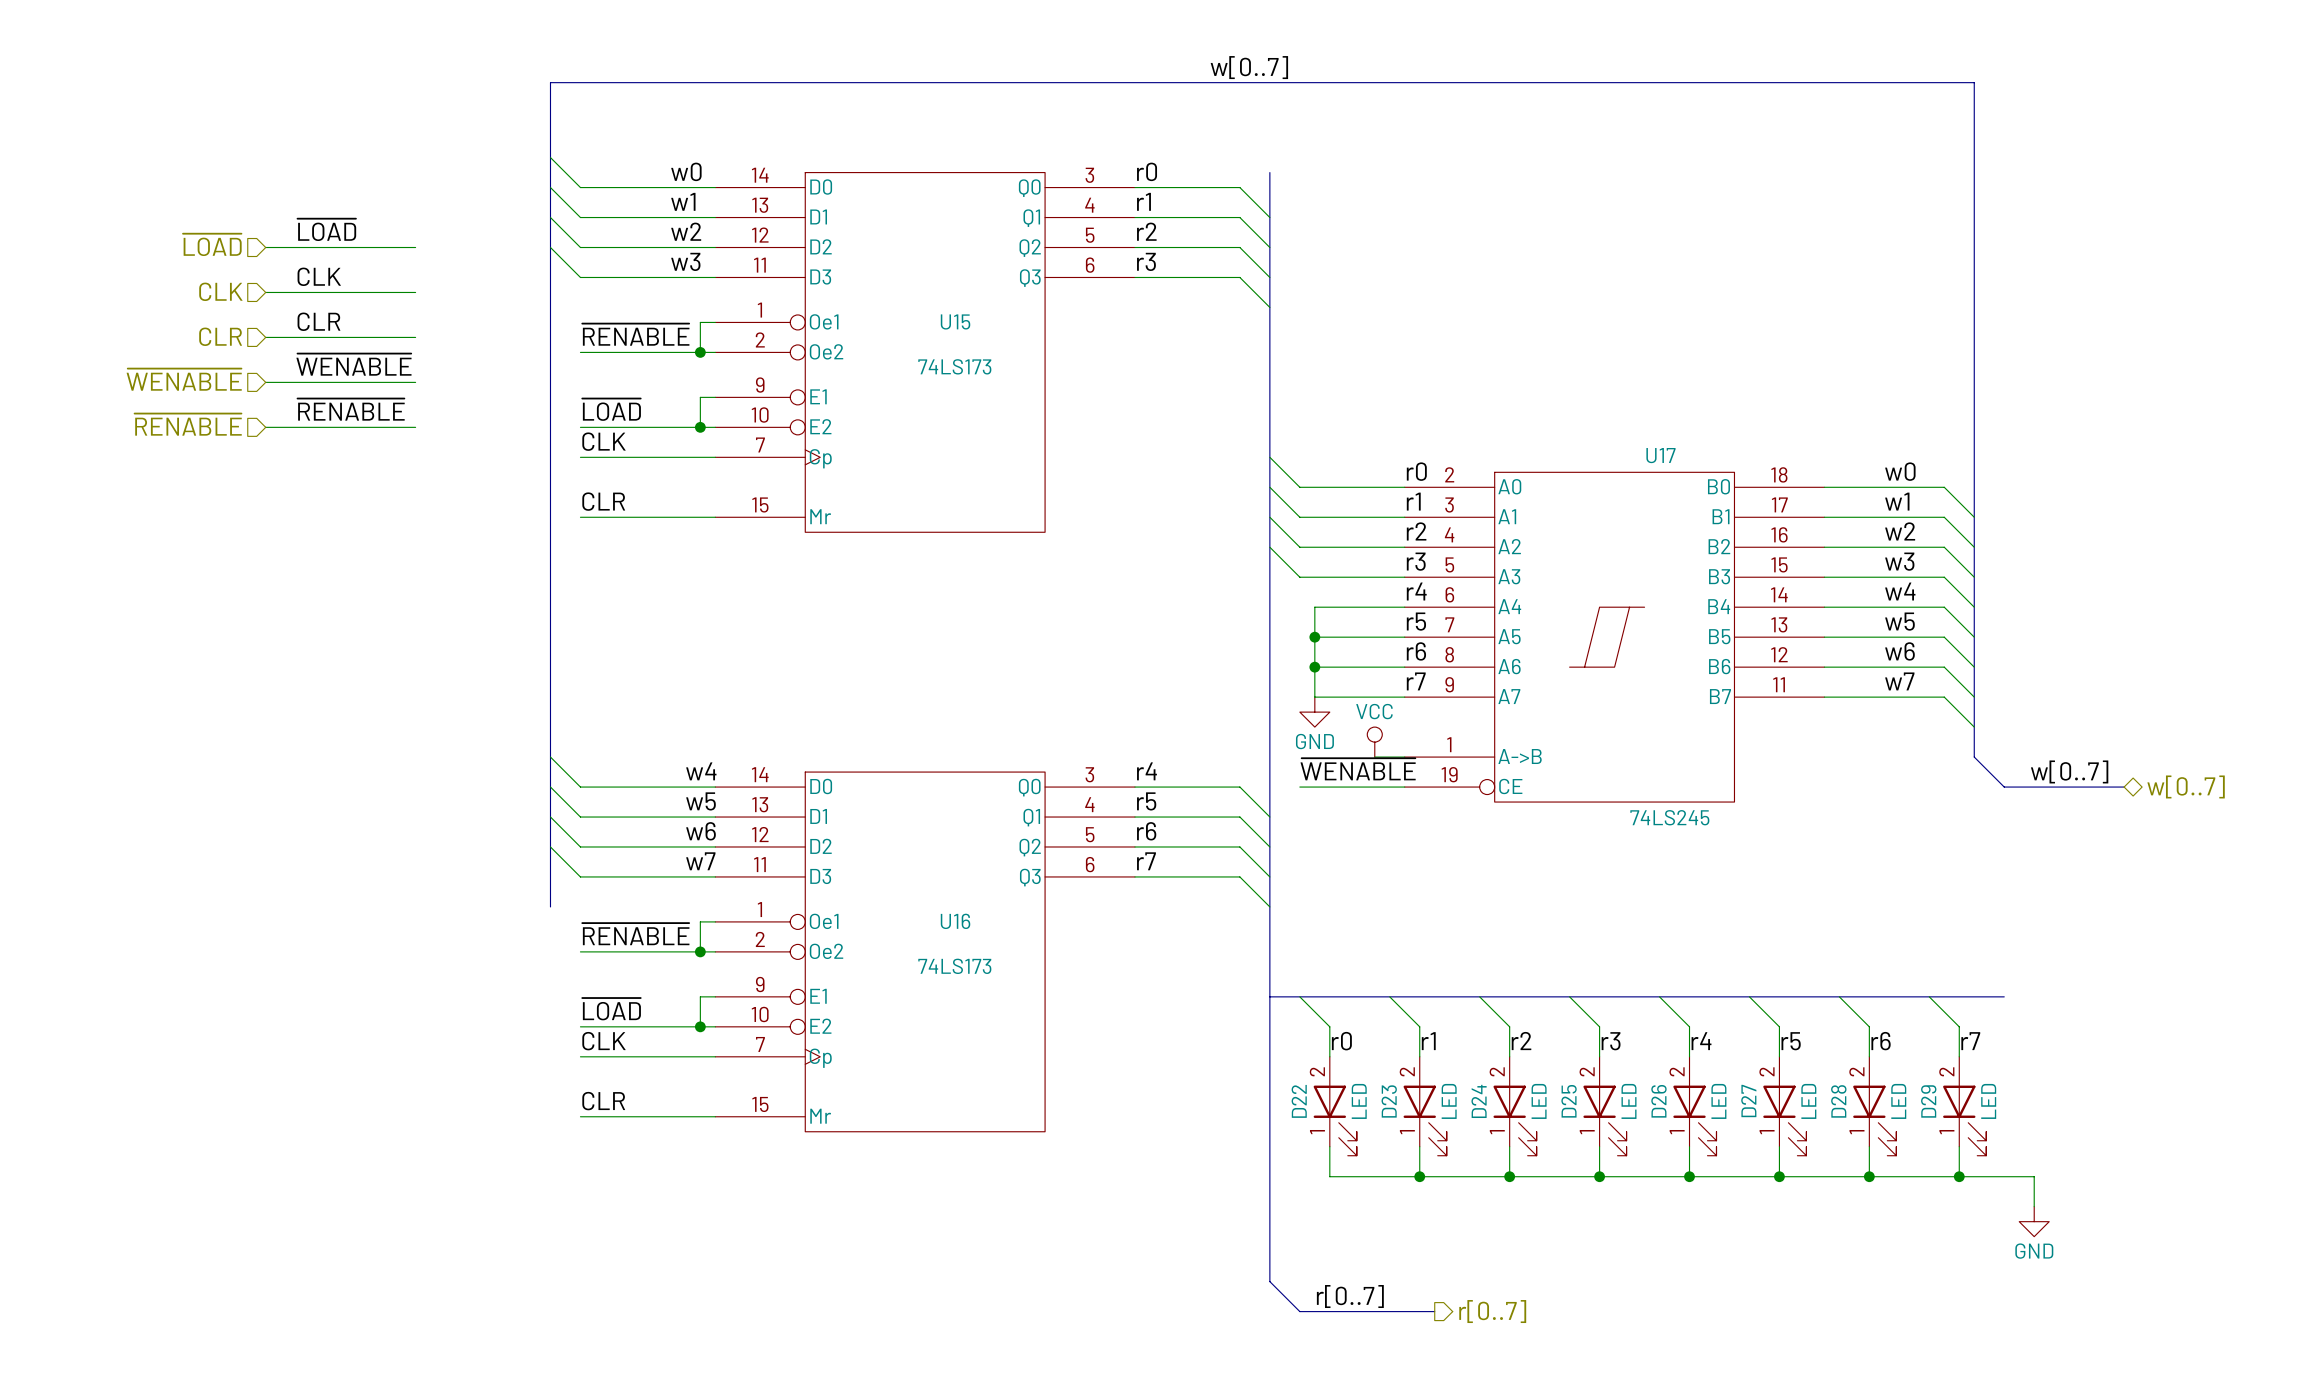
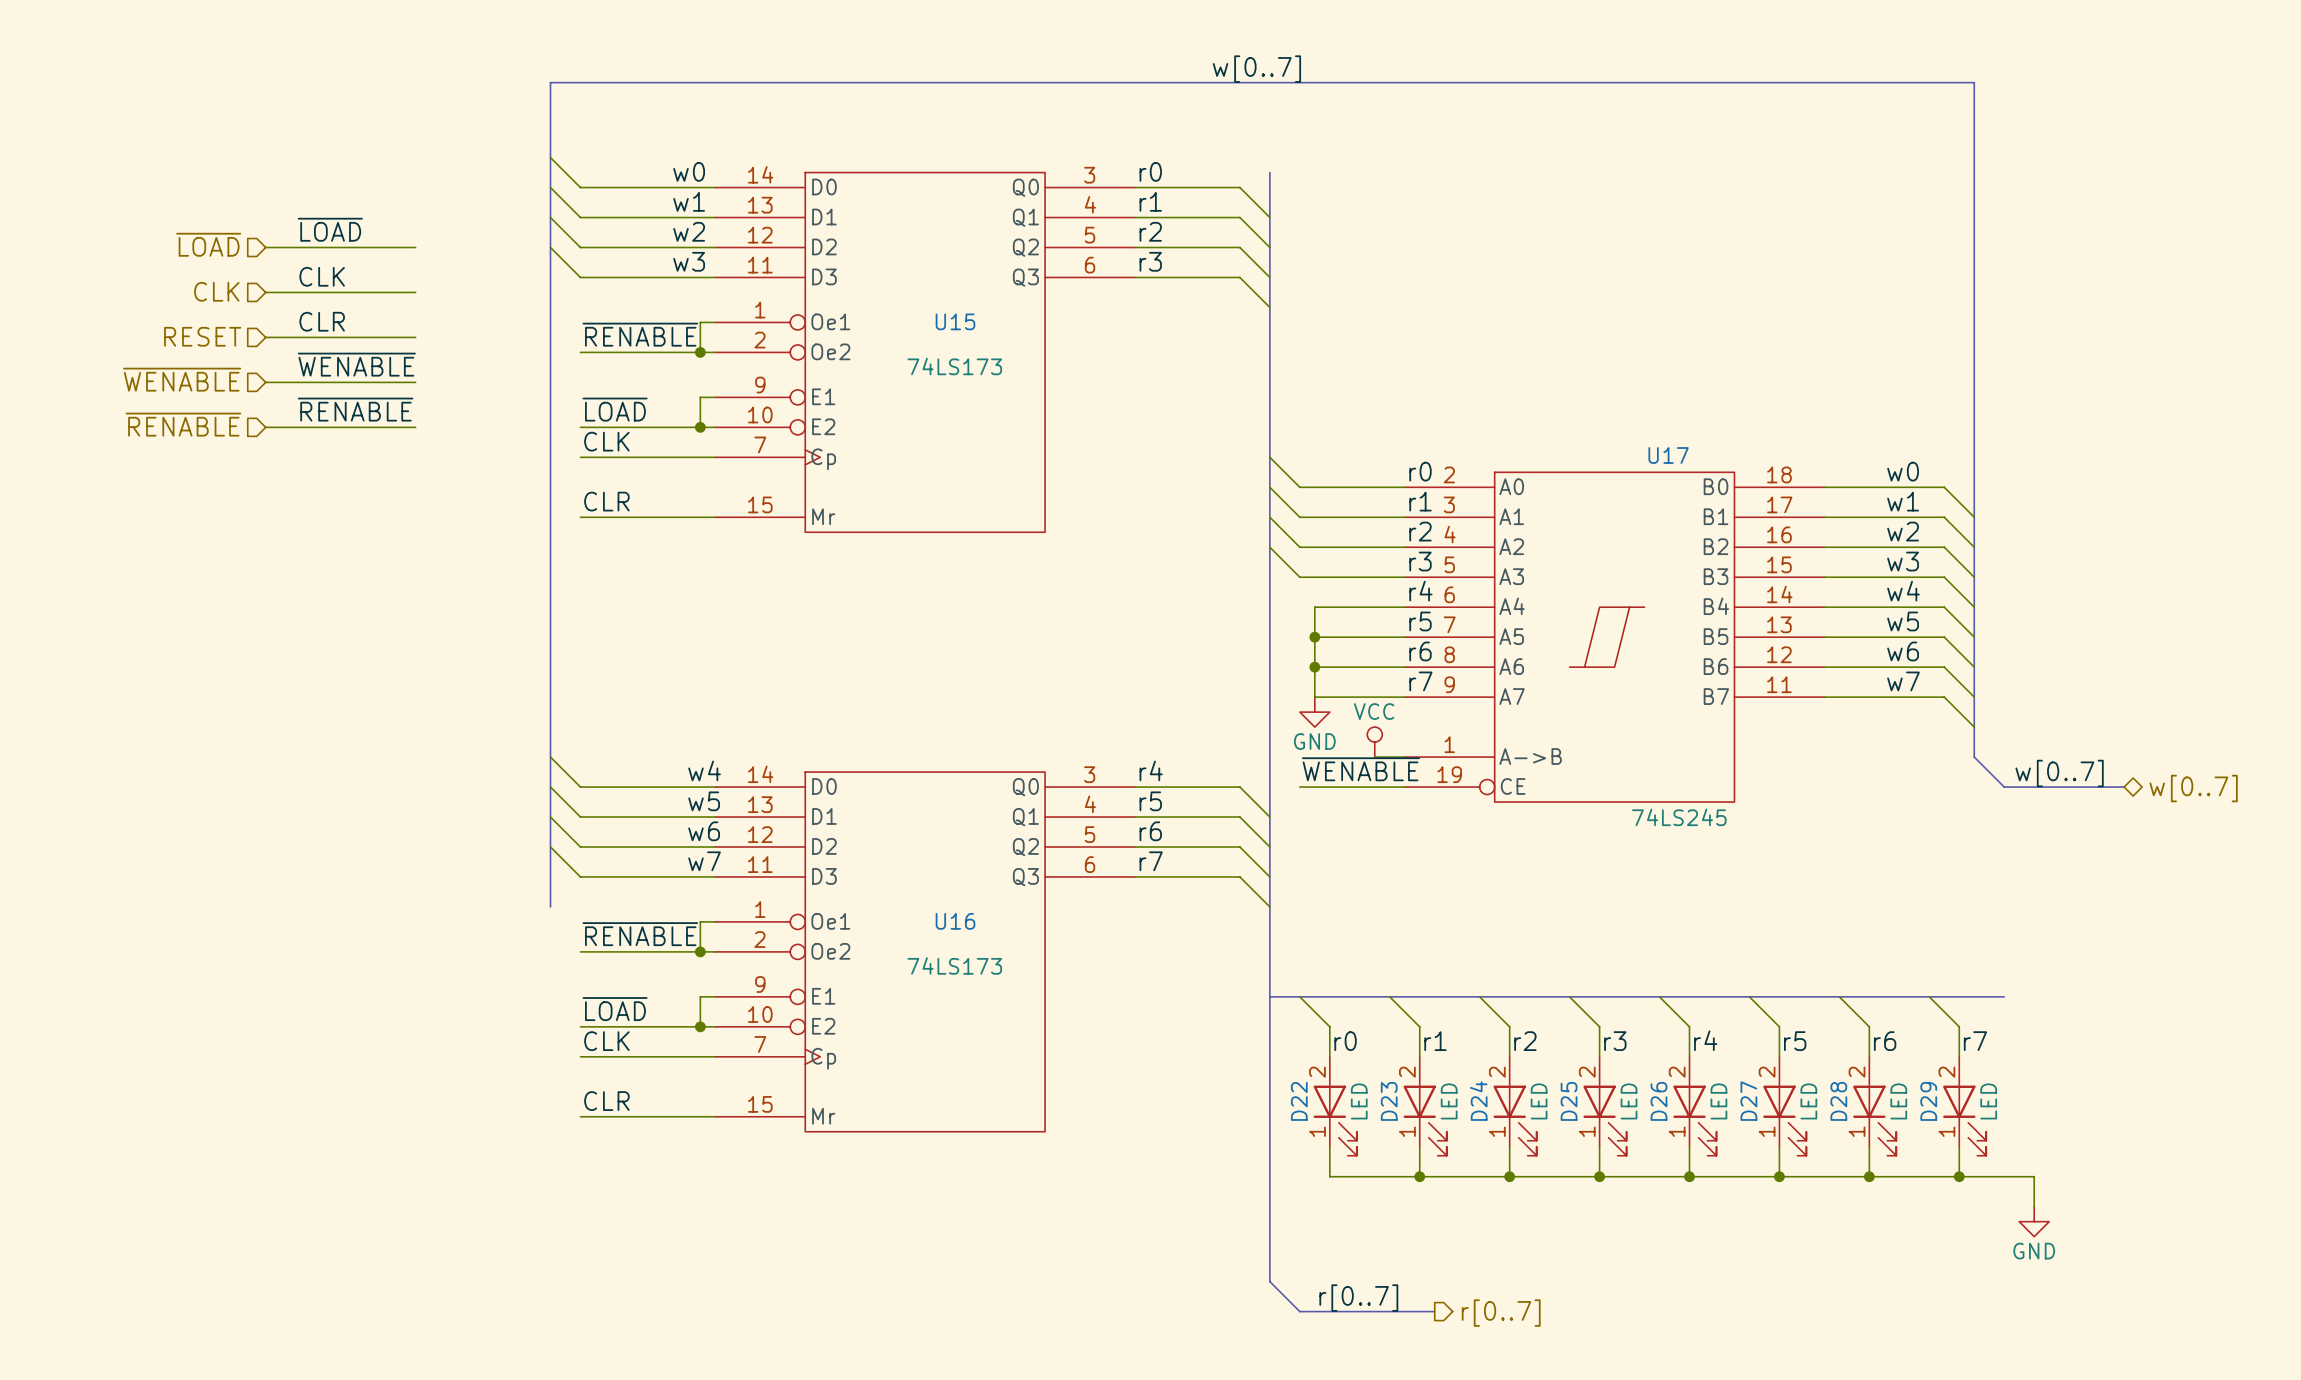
hierarchical label: CLR (220, 336) -> RESET (202, 336)

